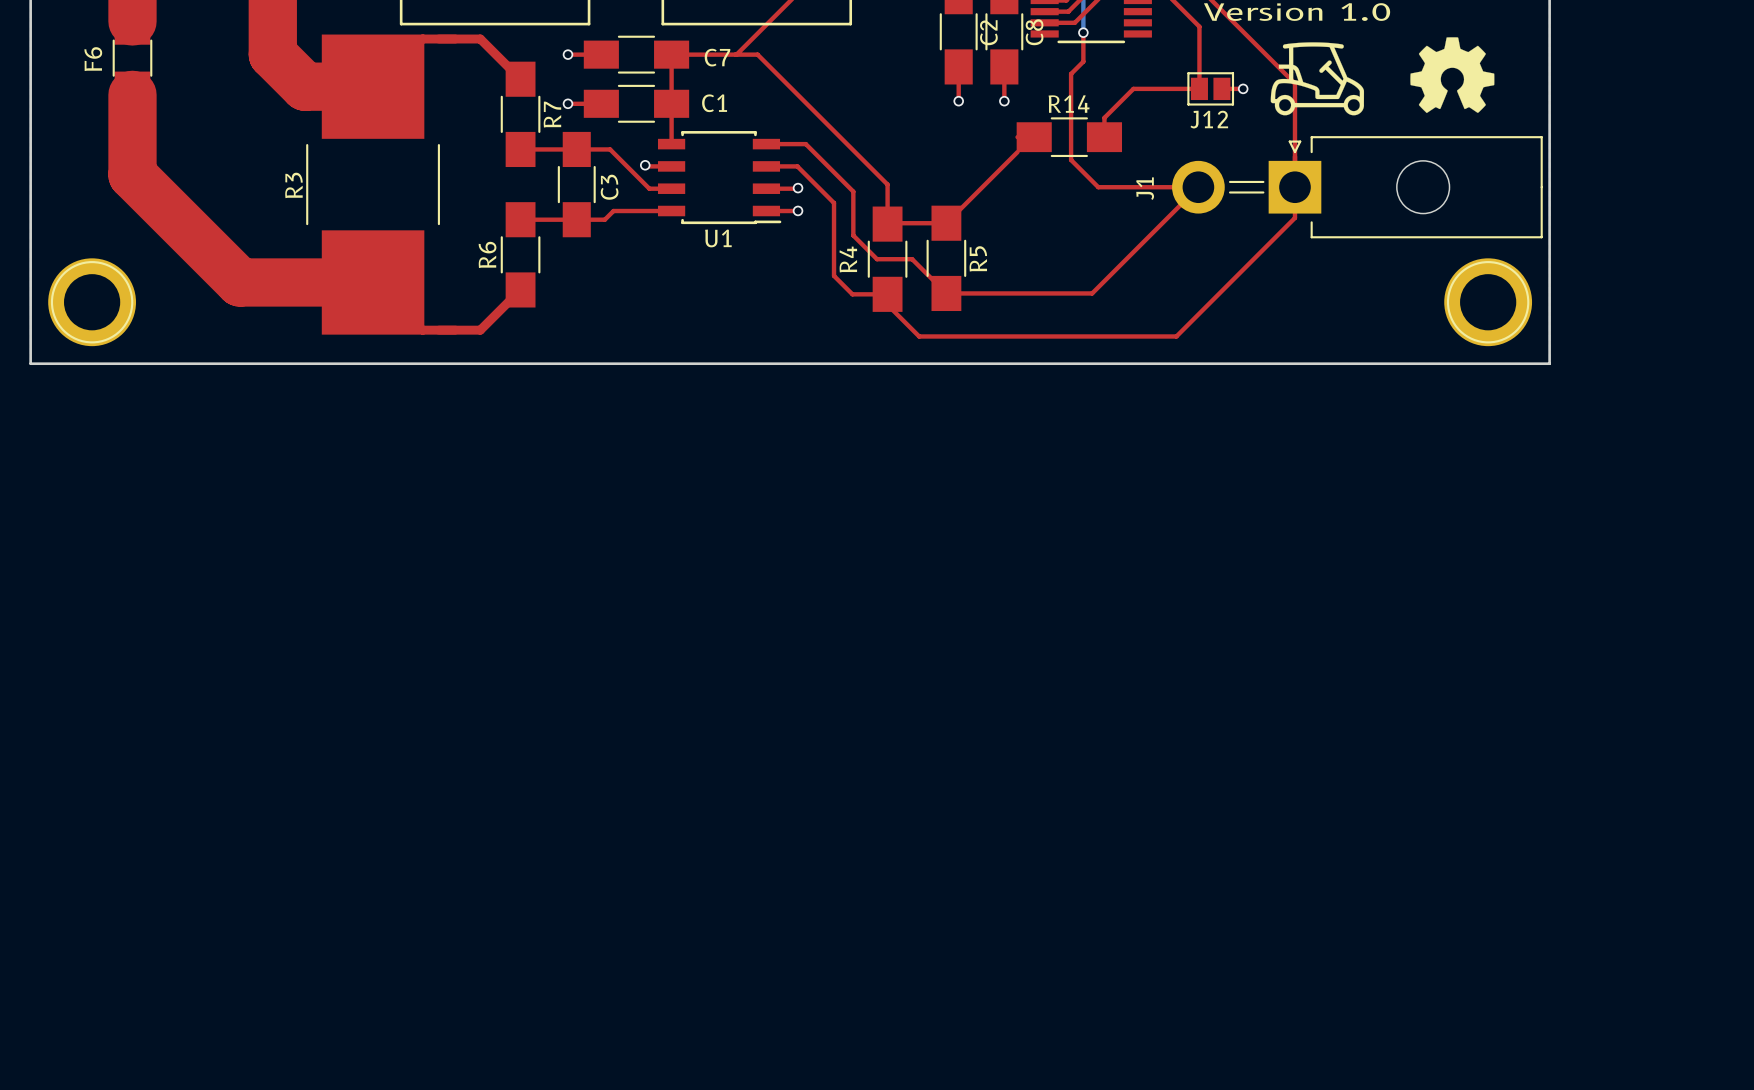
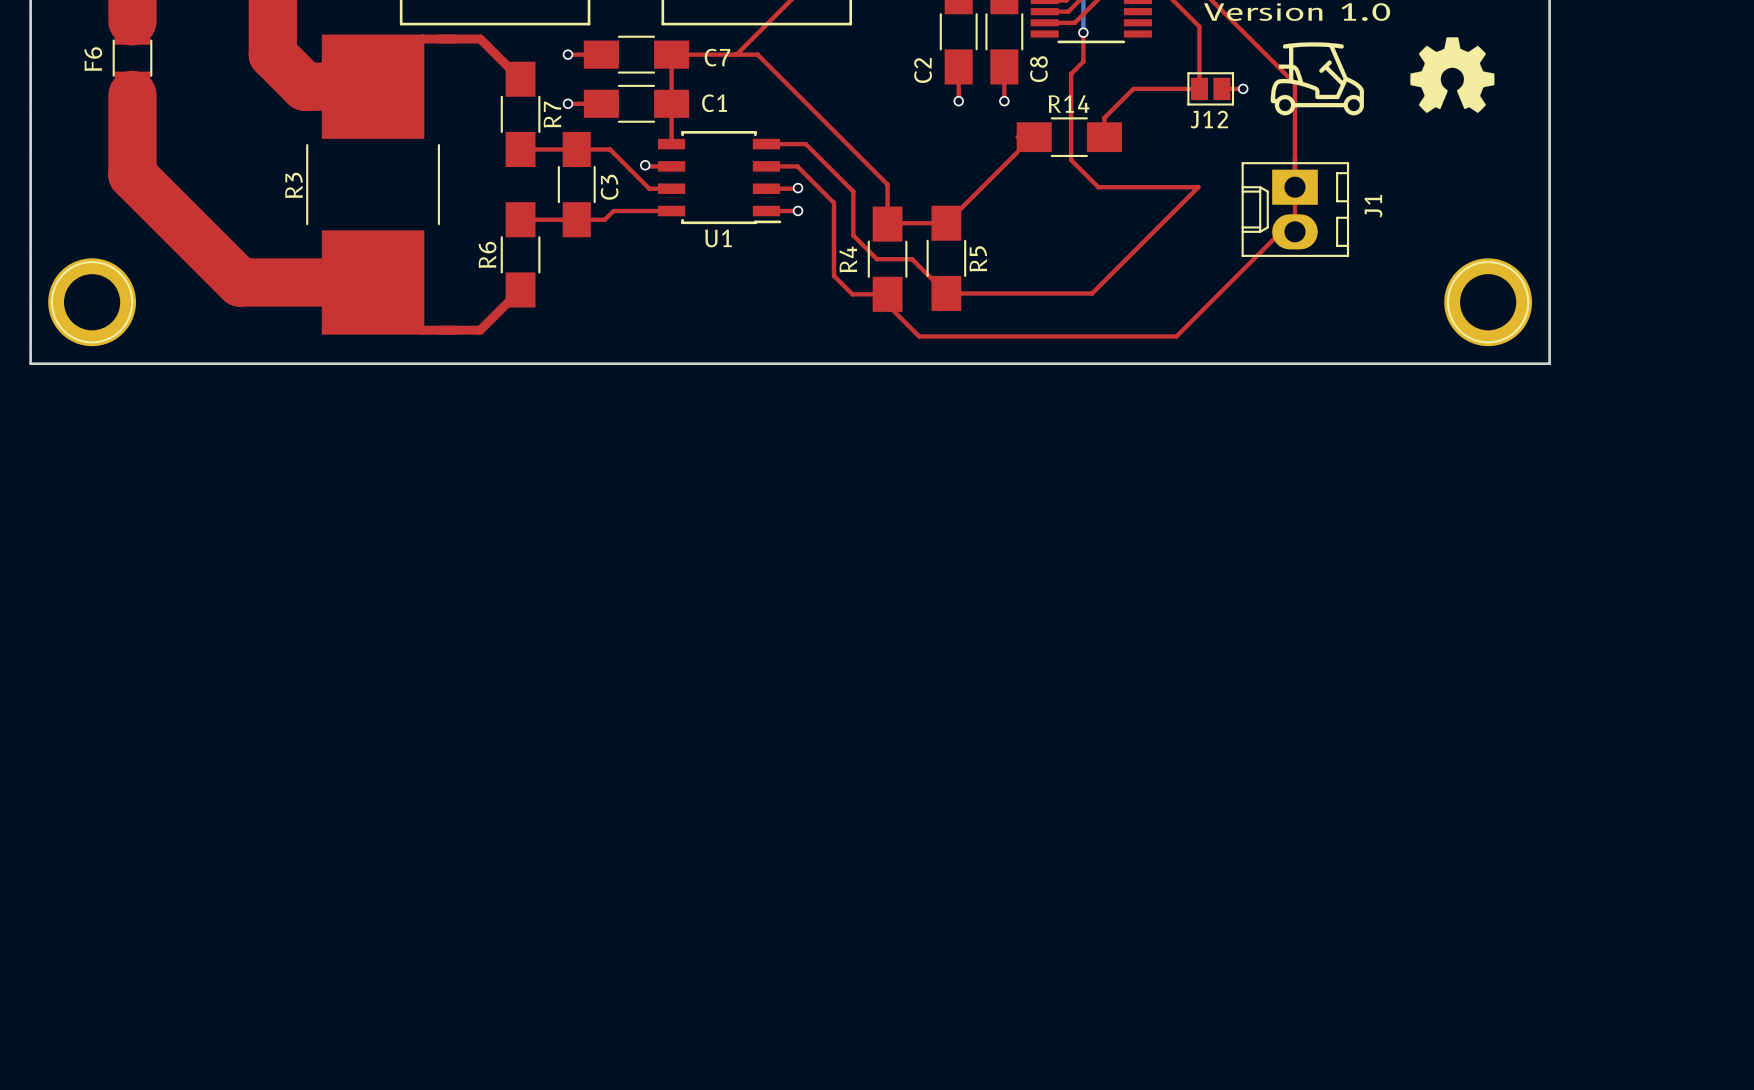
C2 name position: C2 (988, 32) -> C2 (923, 70)
C8 name position: C8 (1034, 32) -> C8 (1038, 69)
J1 footprint: [1172, 136, 1543, 239] -> [1241, 162, 1350, 257]
J1 name position: J1 (1145, 188) -> J1 (1373, 206)

